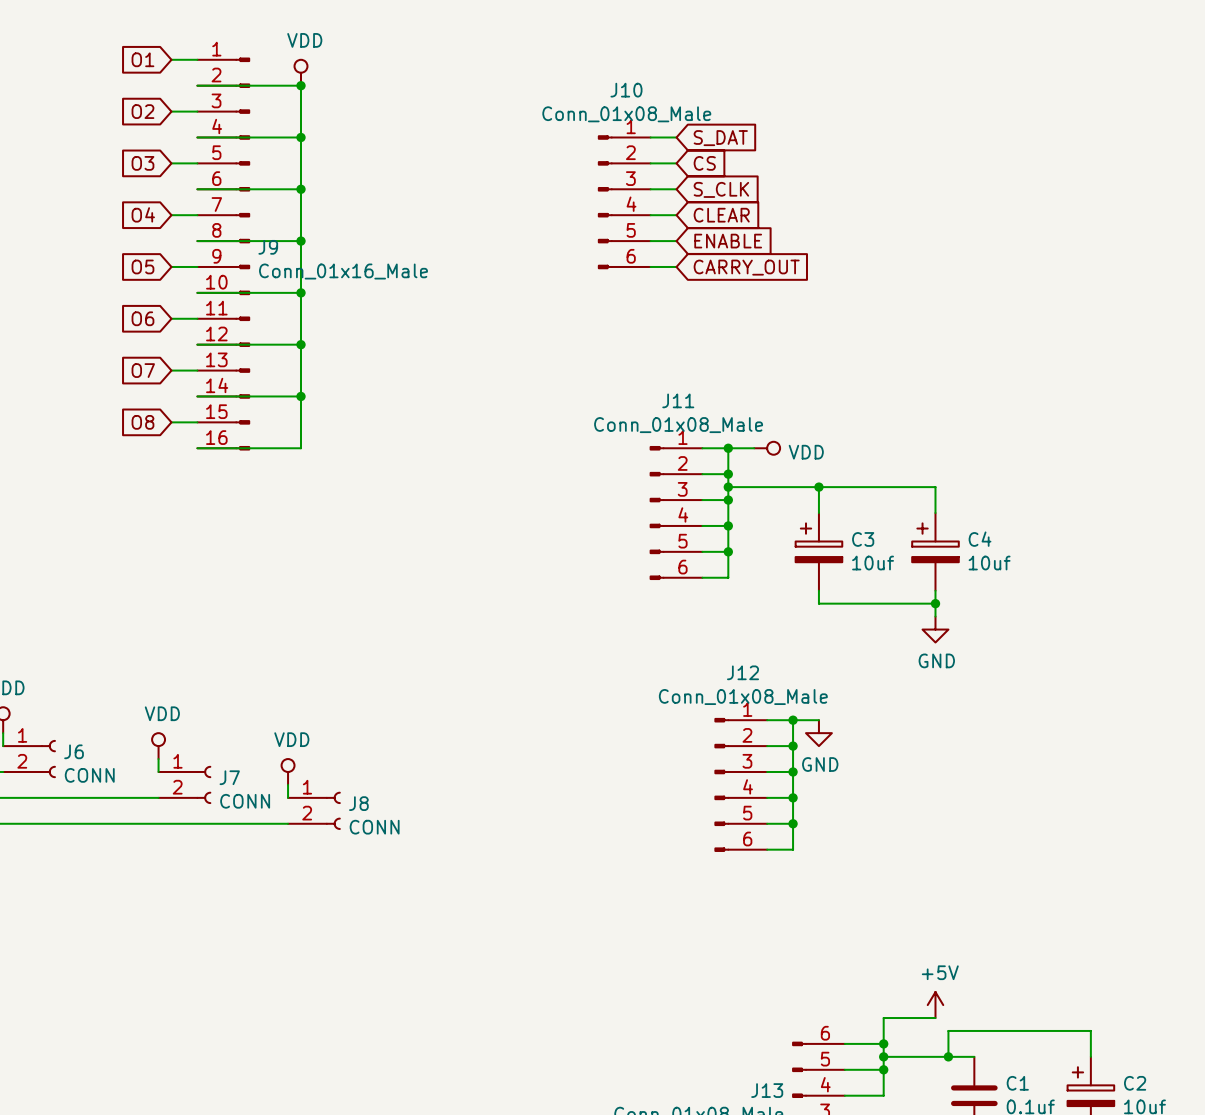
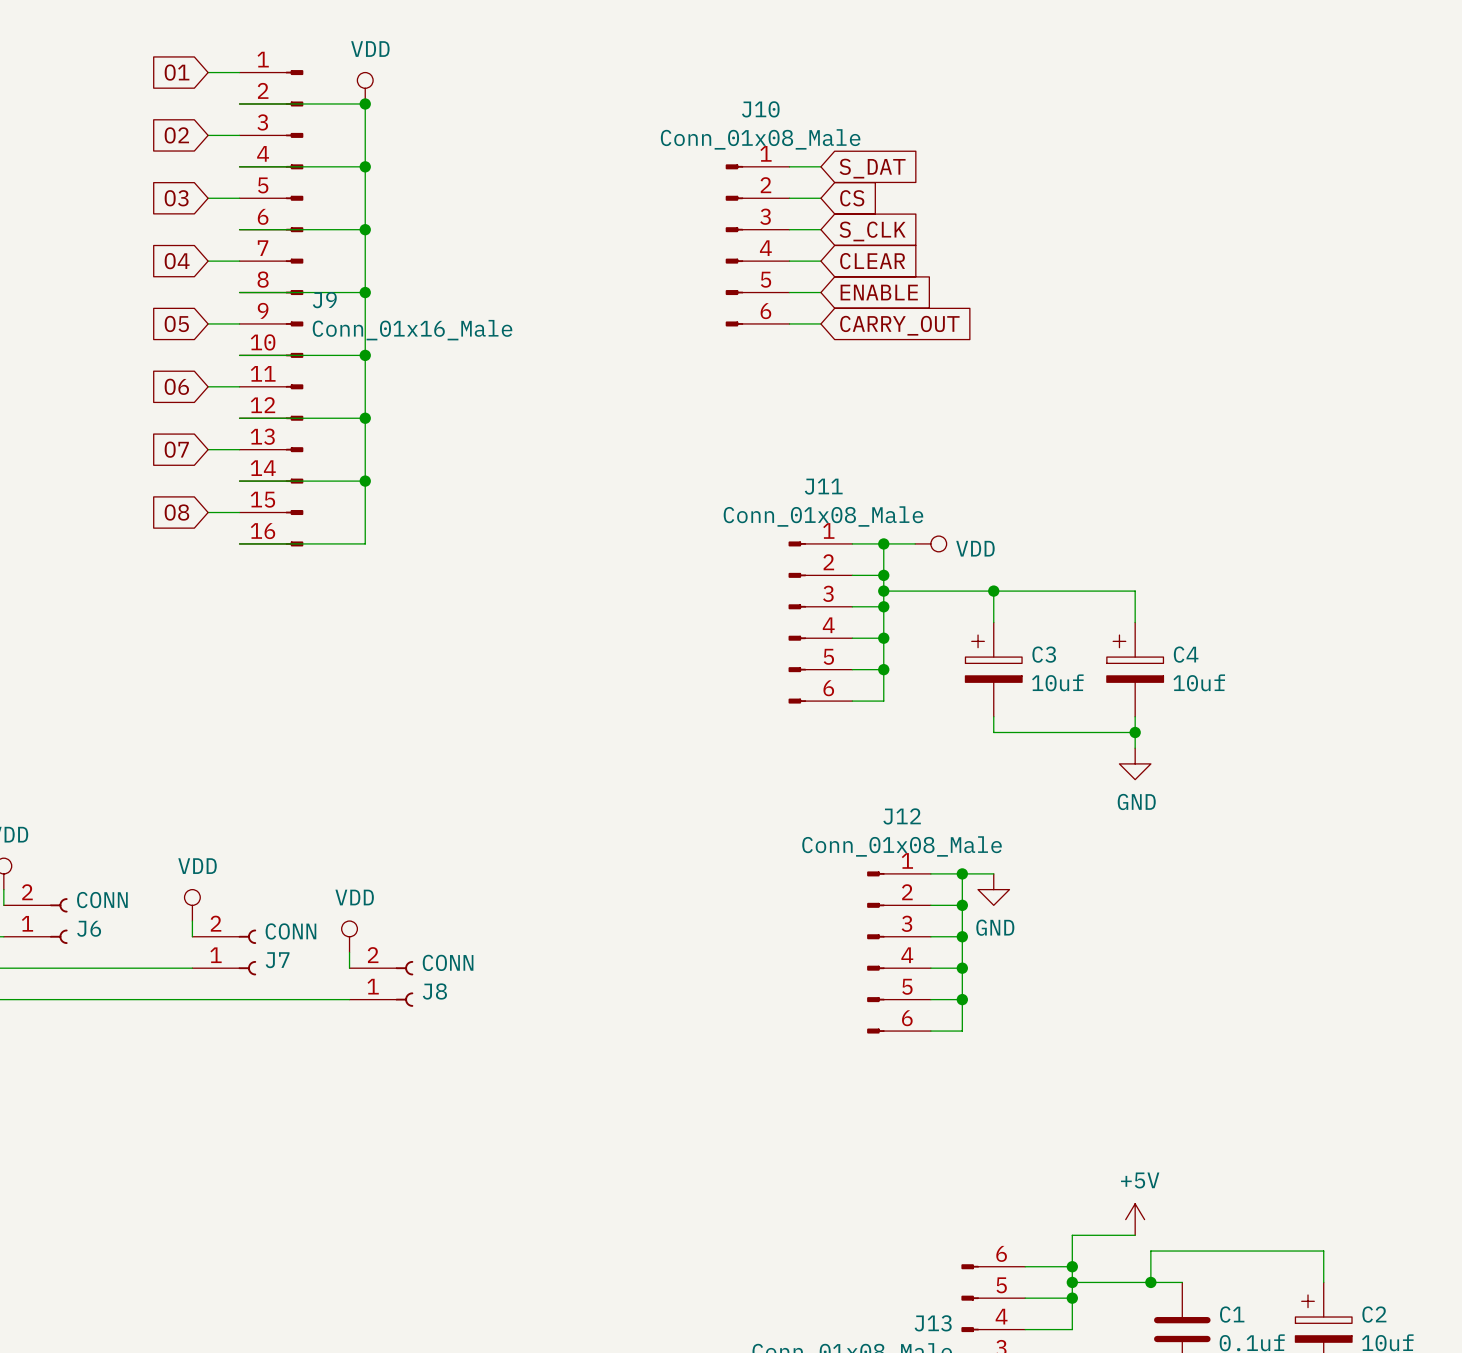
J6 flip: as is (48, 759) -> up-down (58, 921)
J7 flip: as is (203, 784) -> up-down (247, 952)
J8 flip: as is (333, 810) -> up-down (404, 983)

